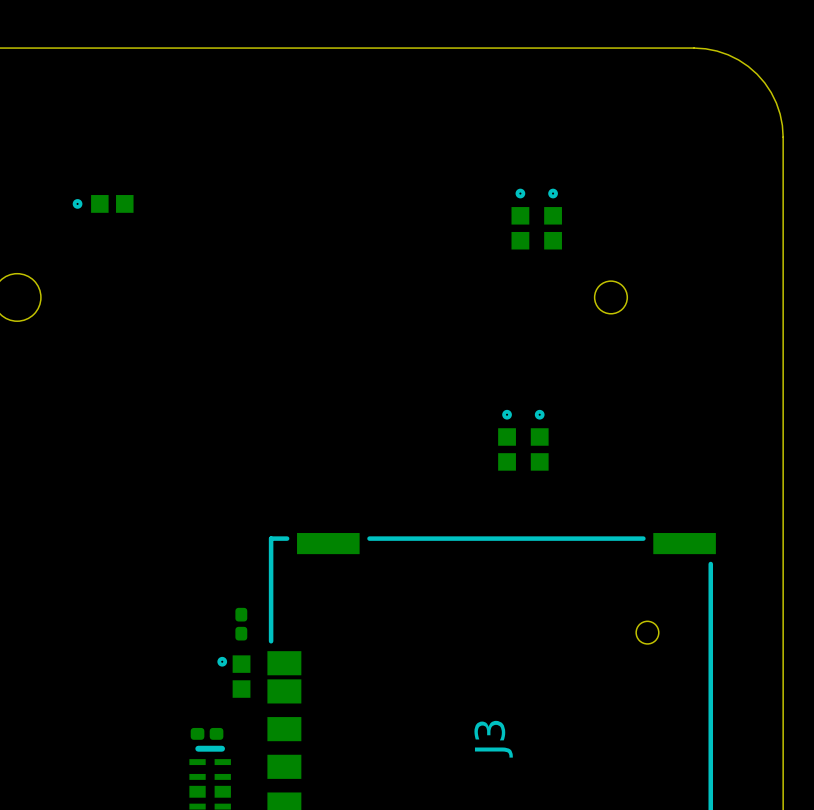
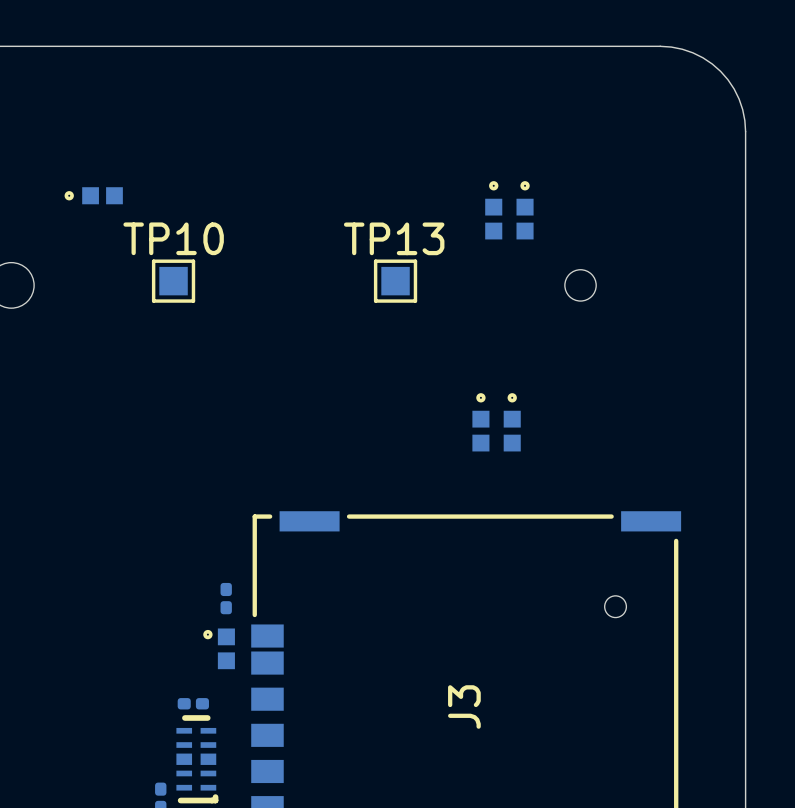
TP10: none -> (173, 281)
TP13: none -> (395, 281)

